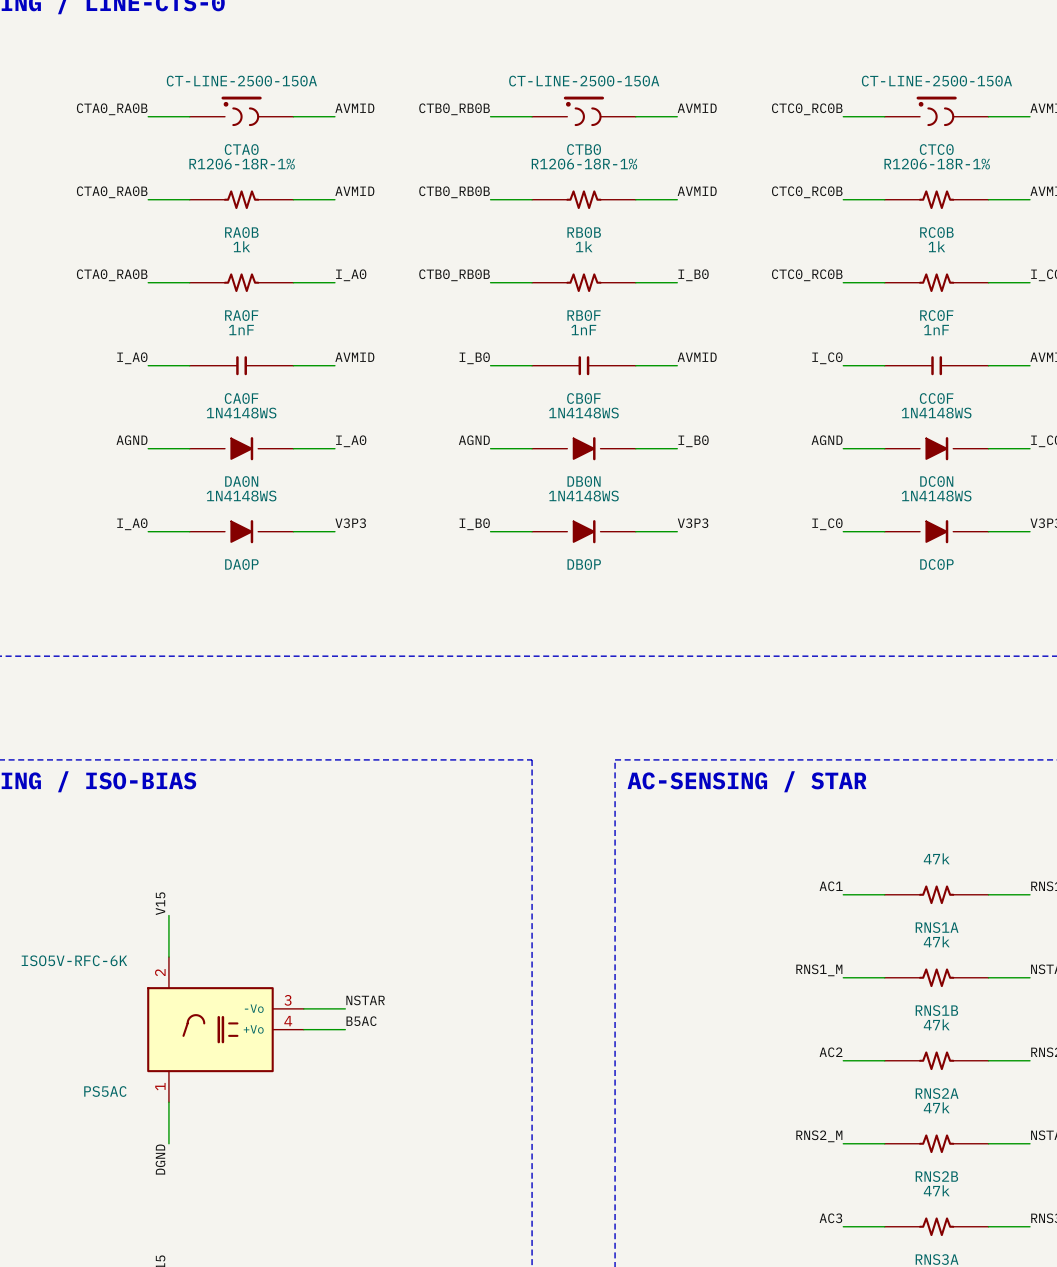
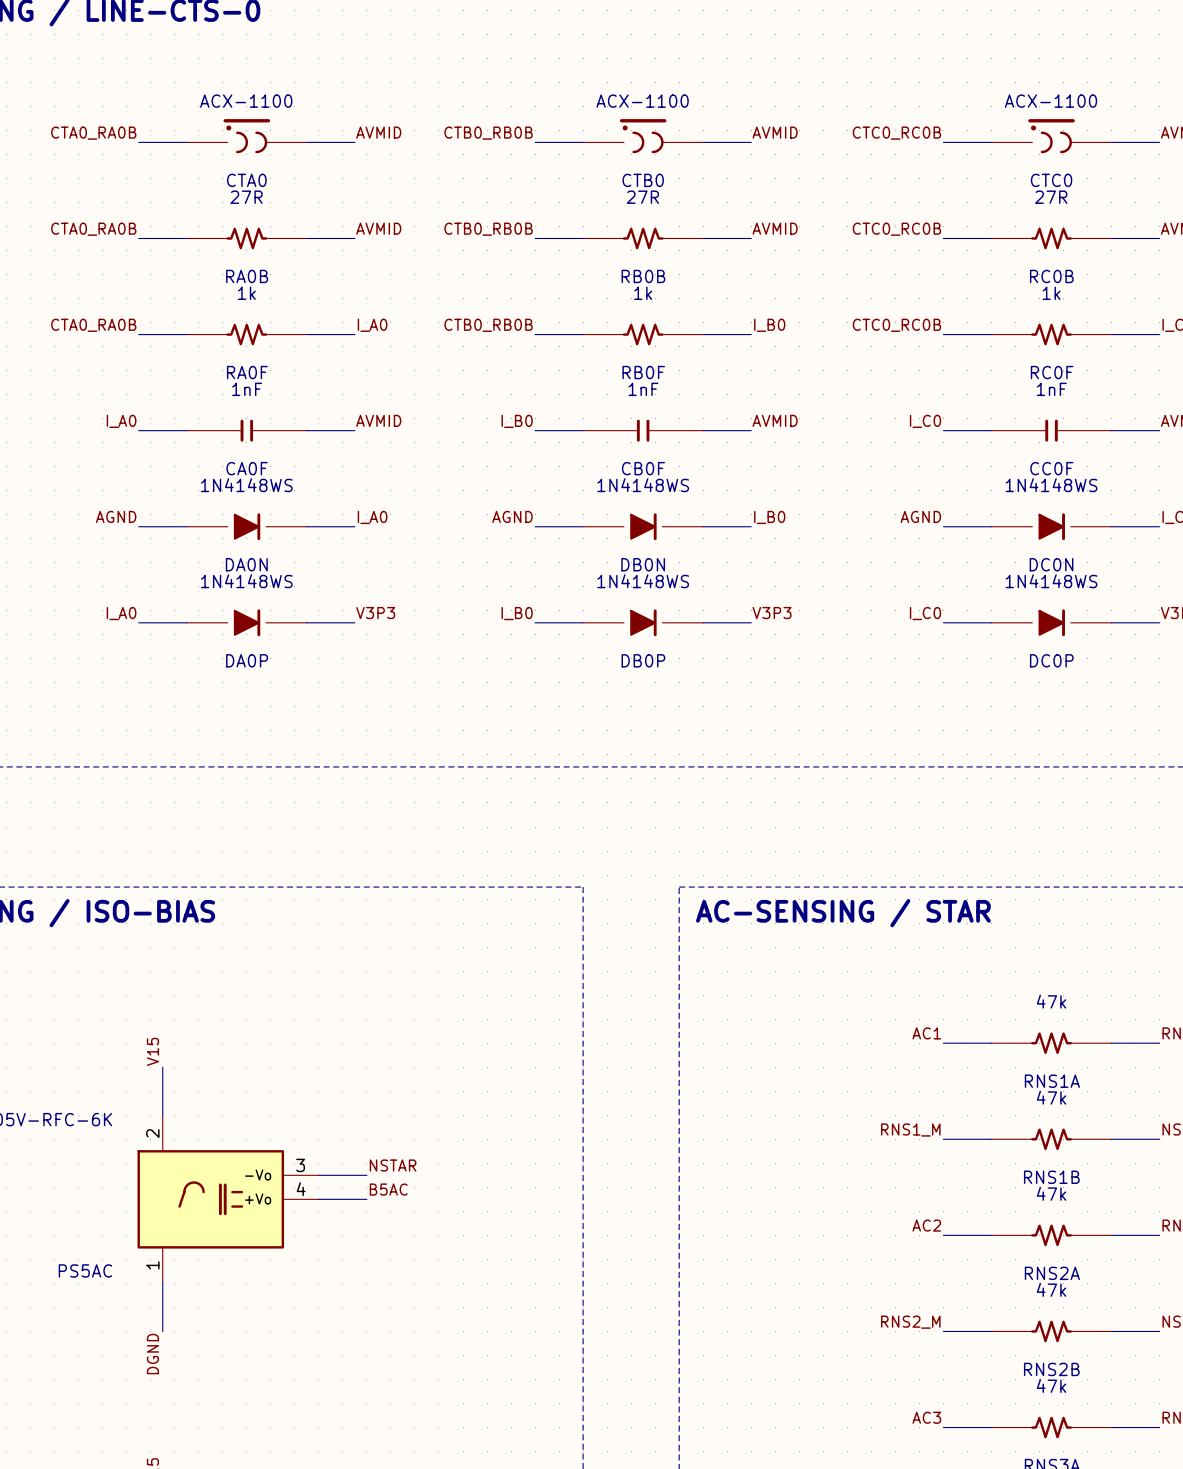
CTA0 value: CT-LINE-2500-150A (241, 81) -> ACX-1100 (246, 101)
CTB0 value: CT-LINE-2500-150A (584, 81) -> ACX-1100 (642, 101)
CTC0 value: CT-LINE-2500-150A (936, 81) -> ACX-1100 (1050, 101)
RA0B value: R1206-18R-1% (242, 164) -> 27R (246, 197)
RB0B value: R1206-18R-1% (584, 164) -> 27R (642, 197)
RC0B value: R1206-18R-1% (937, 164) -> 27R (1051, 197)

